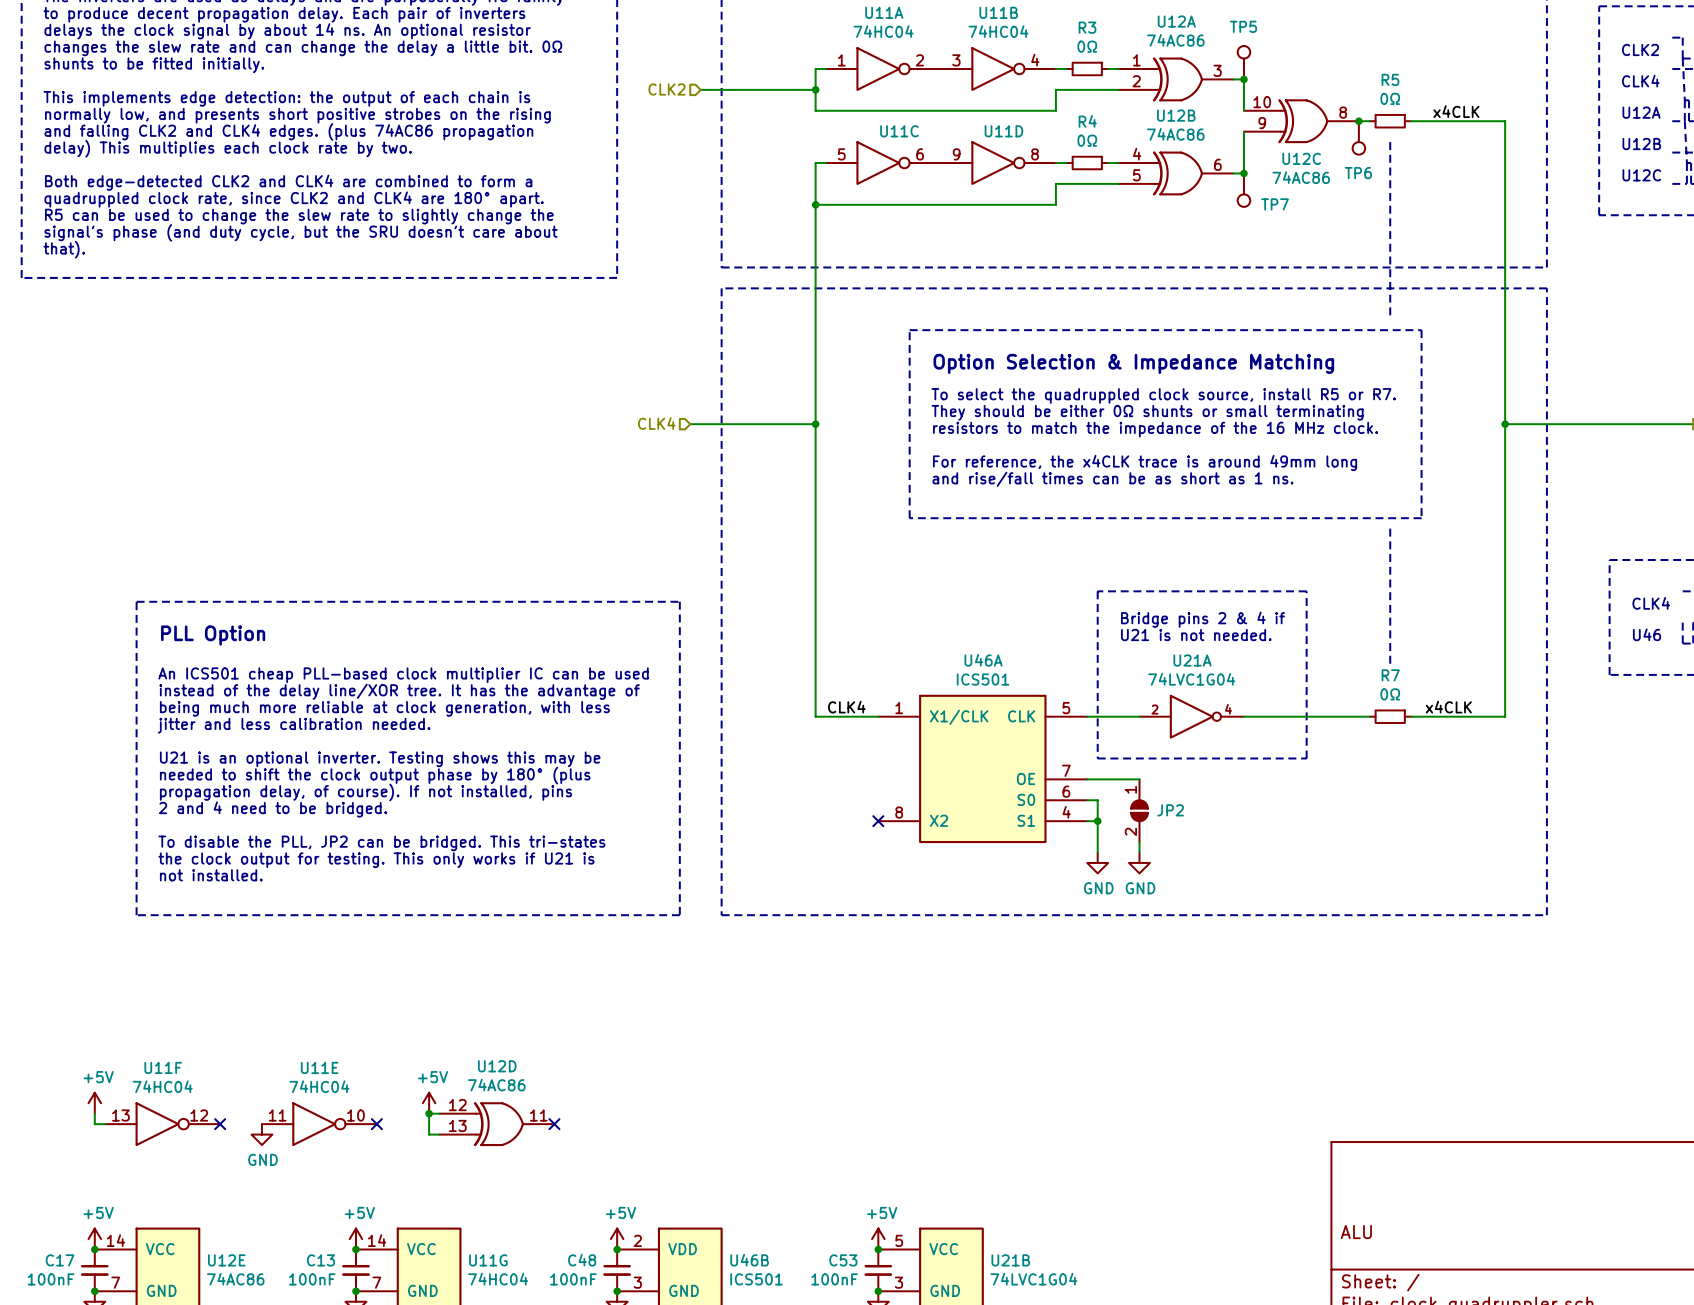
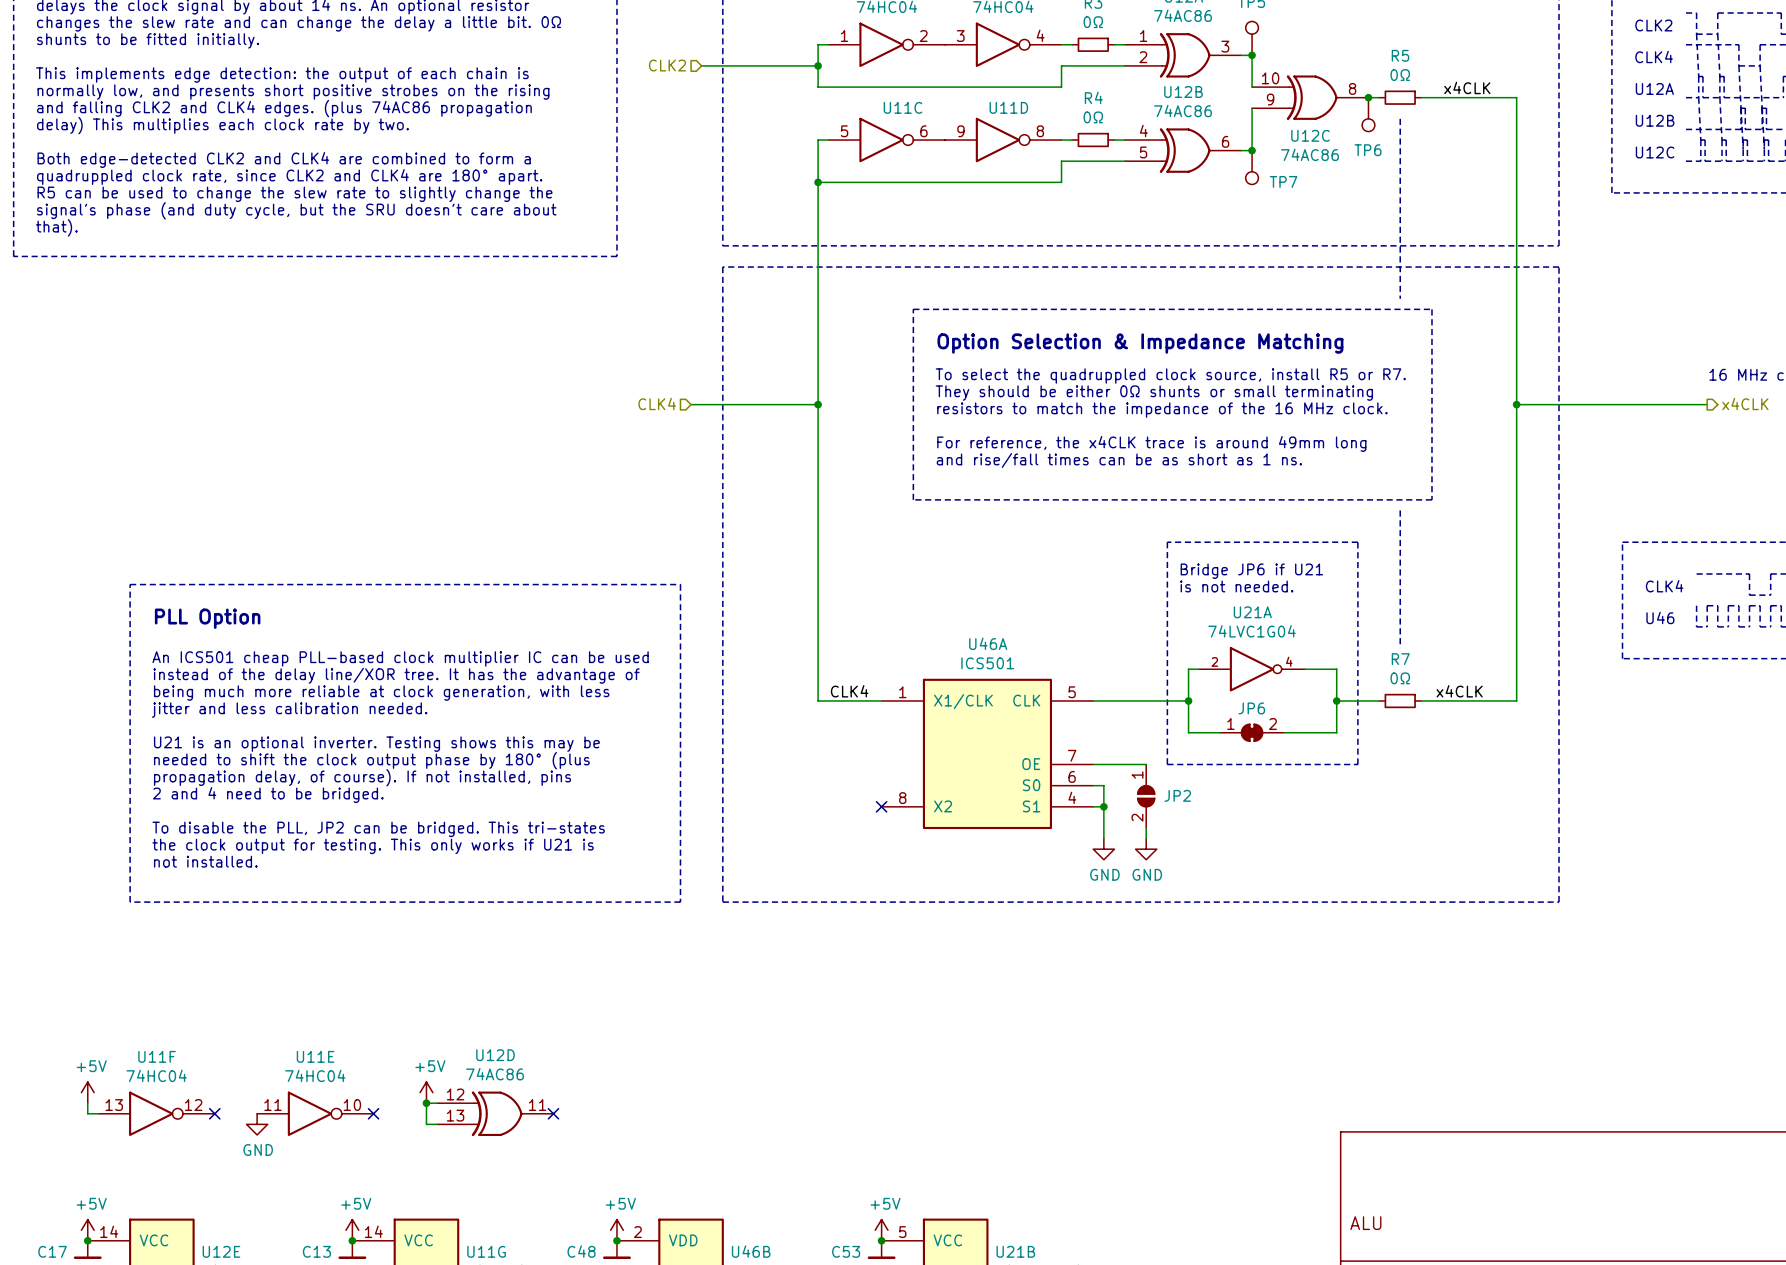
line: none -> (1167, 542) (1167, 764) (1357, 764) (1357, 542) (1167, 542)
text: none -> Bridge JP6 if U21 (1251, 571)
line: (1097, 591) (1097, 758) (1306, 758) (1306, 591) (1097, 591) -> none
text: none -> is not needed. (1236, 586)
text: Bridge pins 2 & 4 if (1203, 619) -> none
text: U21 is not needed. (1196, 635) -> none
wire: none -> (1199, 669) (1188, 669) (1188, 732) (1220, 732)
wire: none -> (1304, 669) (1336, 669) (1336, 732) (1283, 732)
junction: none -> (1188, 700)
U21A position: (1191, 716) -> (1252, 669)
wire: (1243, 716) (1327, 716) -> none
junction: none -> (1336, 700)
JP6: none -> (1252, 732)

